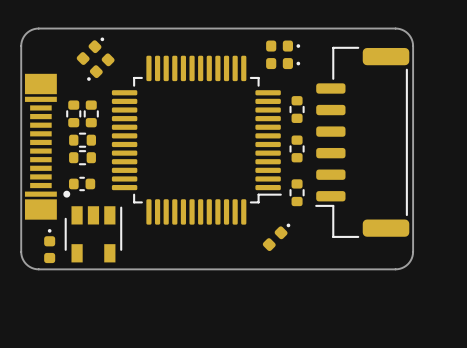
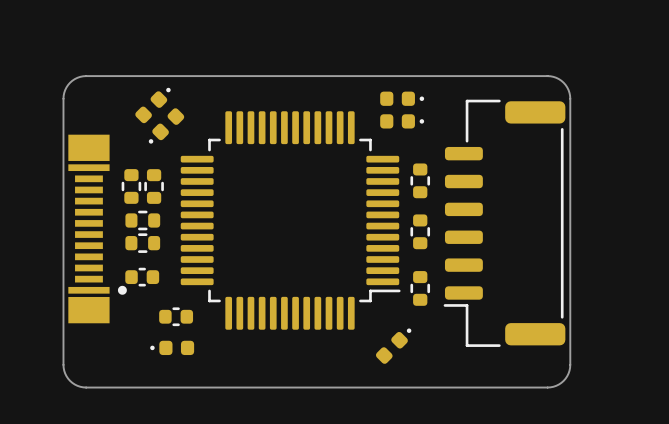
part: none -> (176, 316)
part: (93, 234) -> none
part rotation: 0° (49, 246) -> 90° counterclockwise (172, 347)
part position: (49, 246) -> (172, 347)

